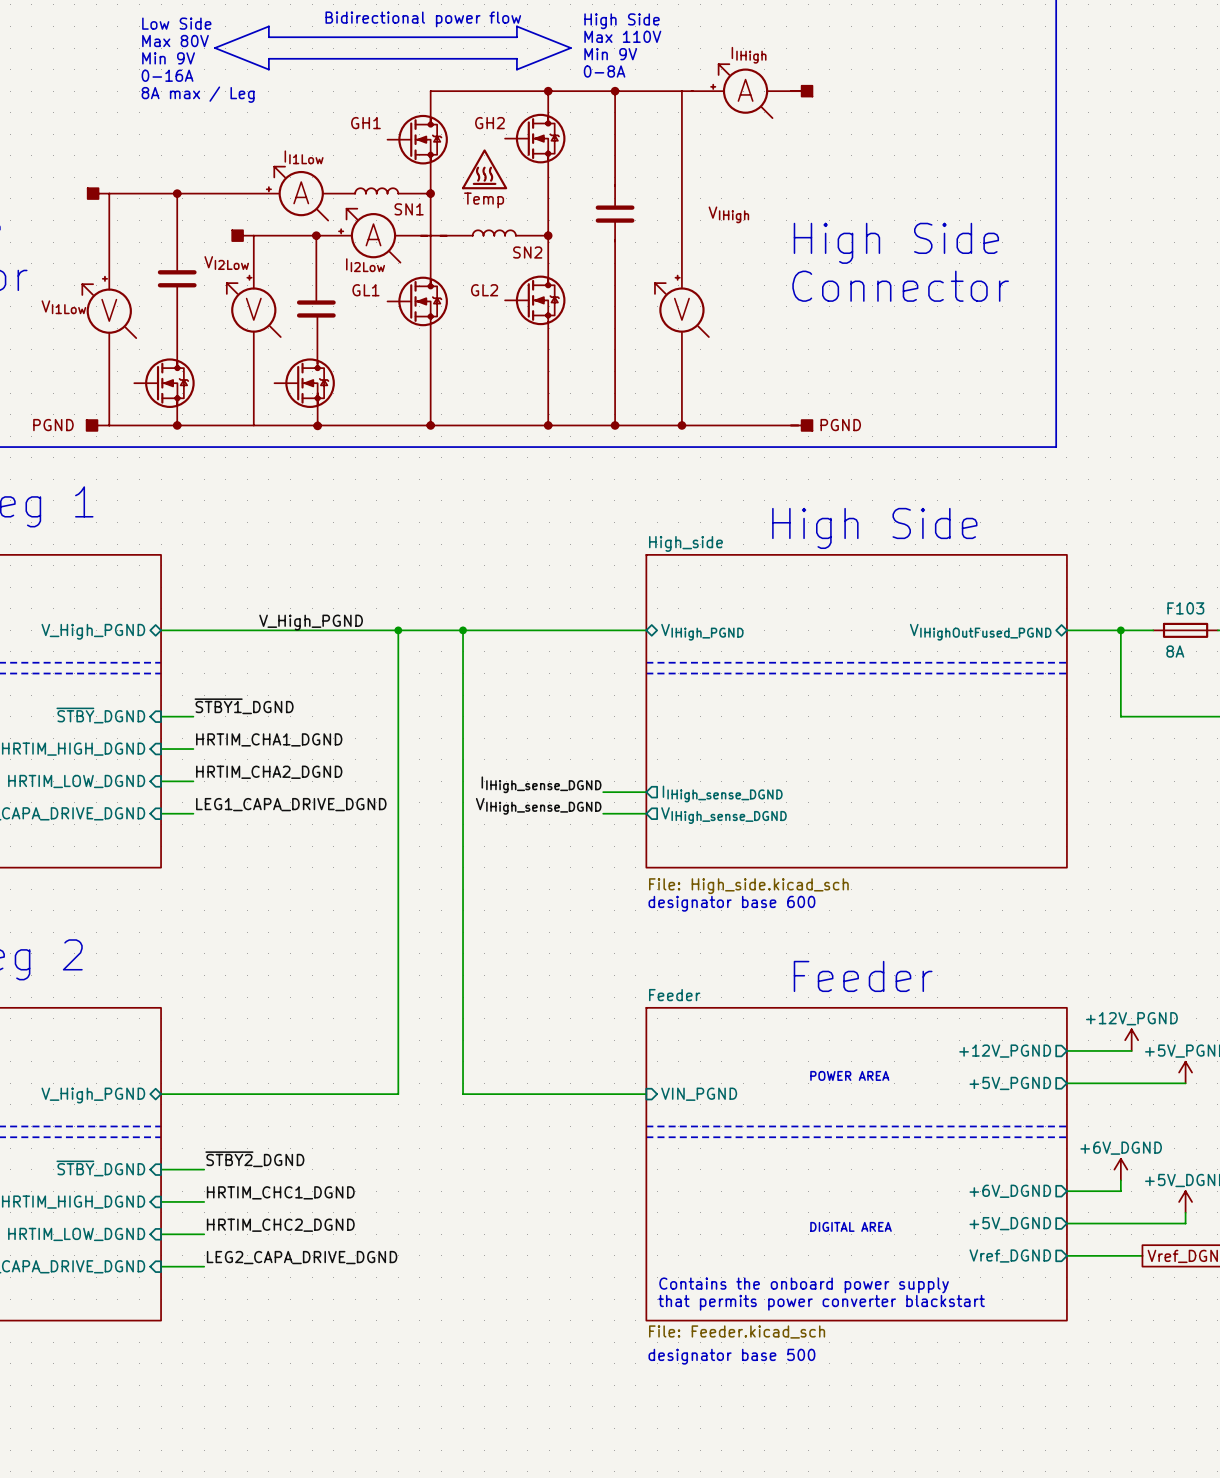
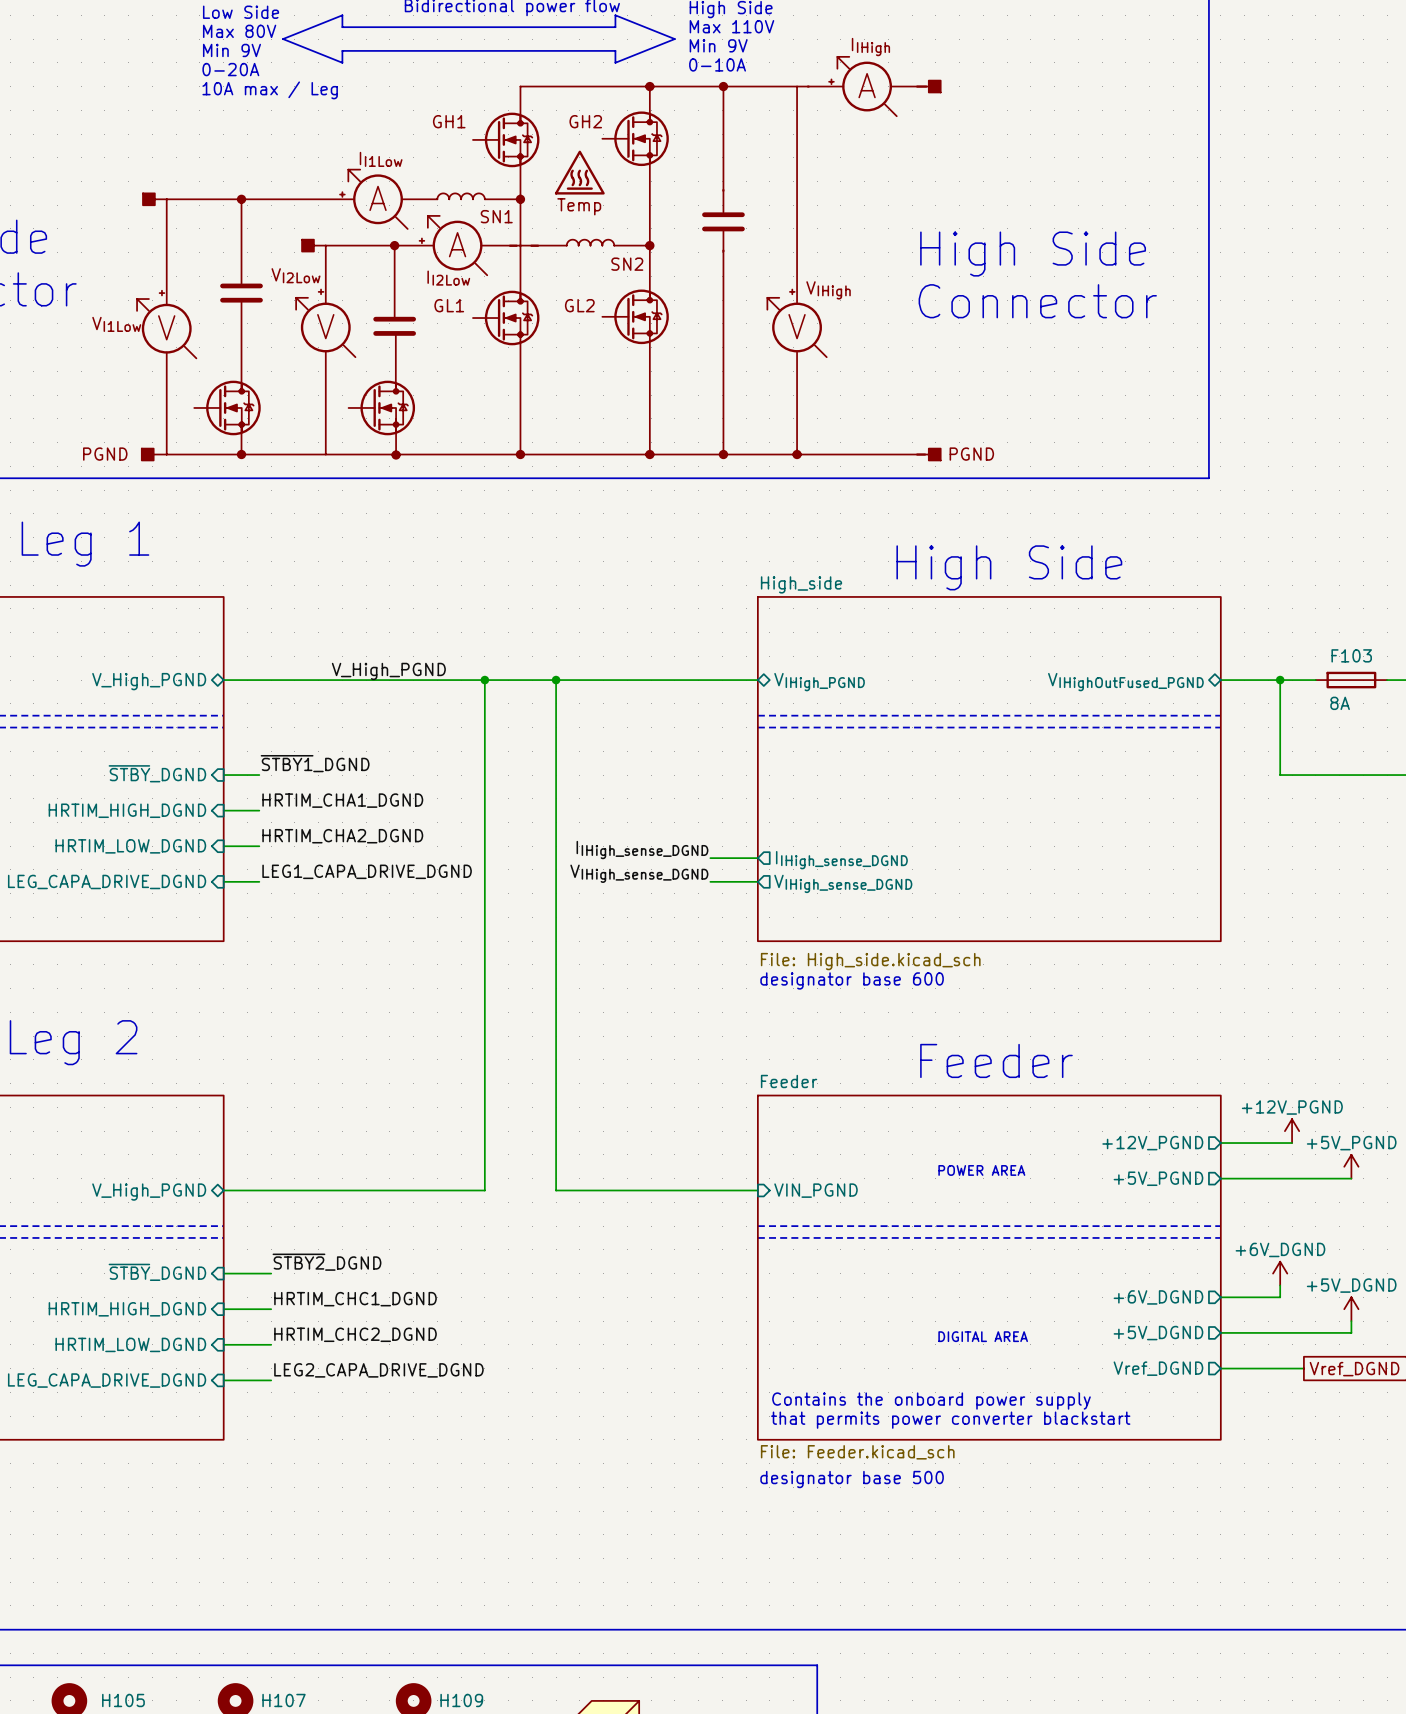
text: 0-8A (604, 71) -> 0-10A (717, 64)
text: 0-16A (167, 75) -> 0-20A (230, 69)
text: 8A max / Leg (198, 94) -> 10A max / Leg (270, 90)
part text position: VIHigh (728, 214) -> VIHigh (828, 290)

